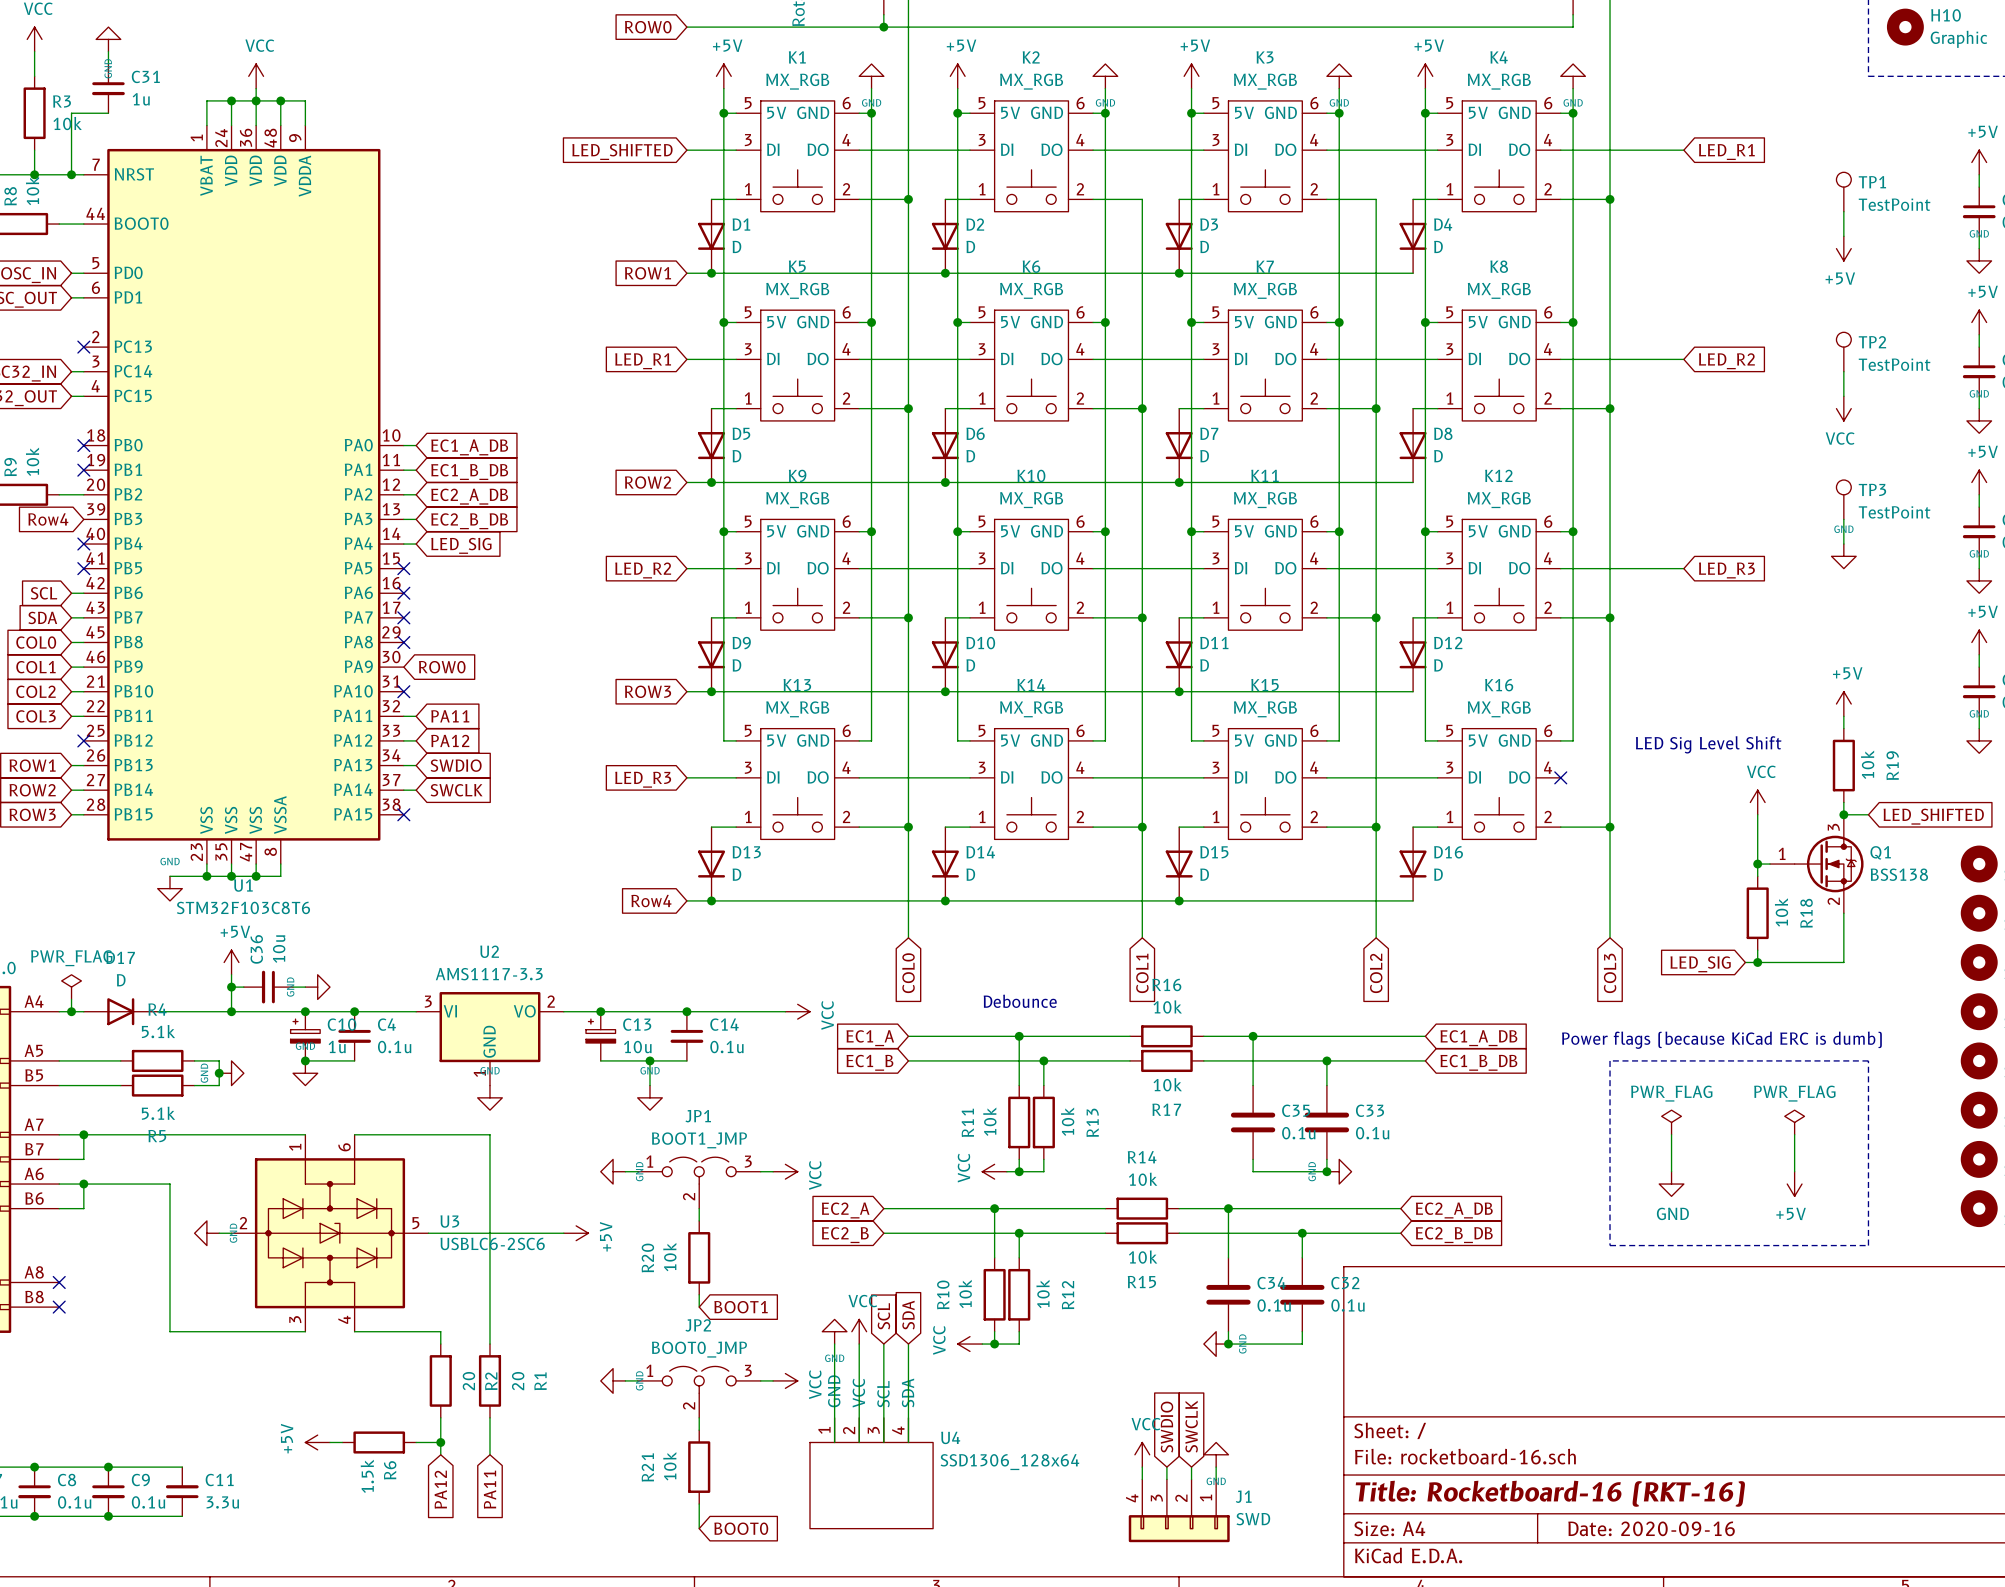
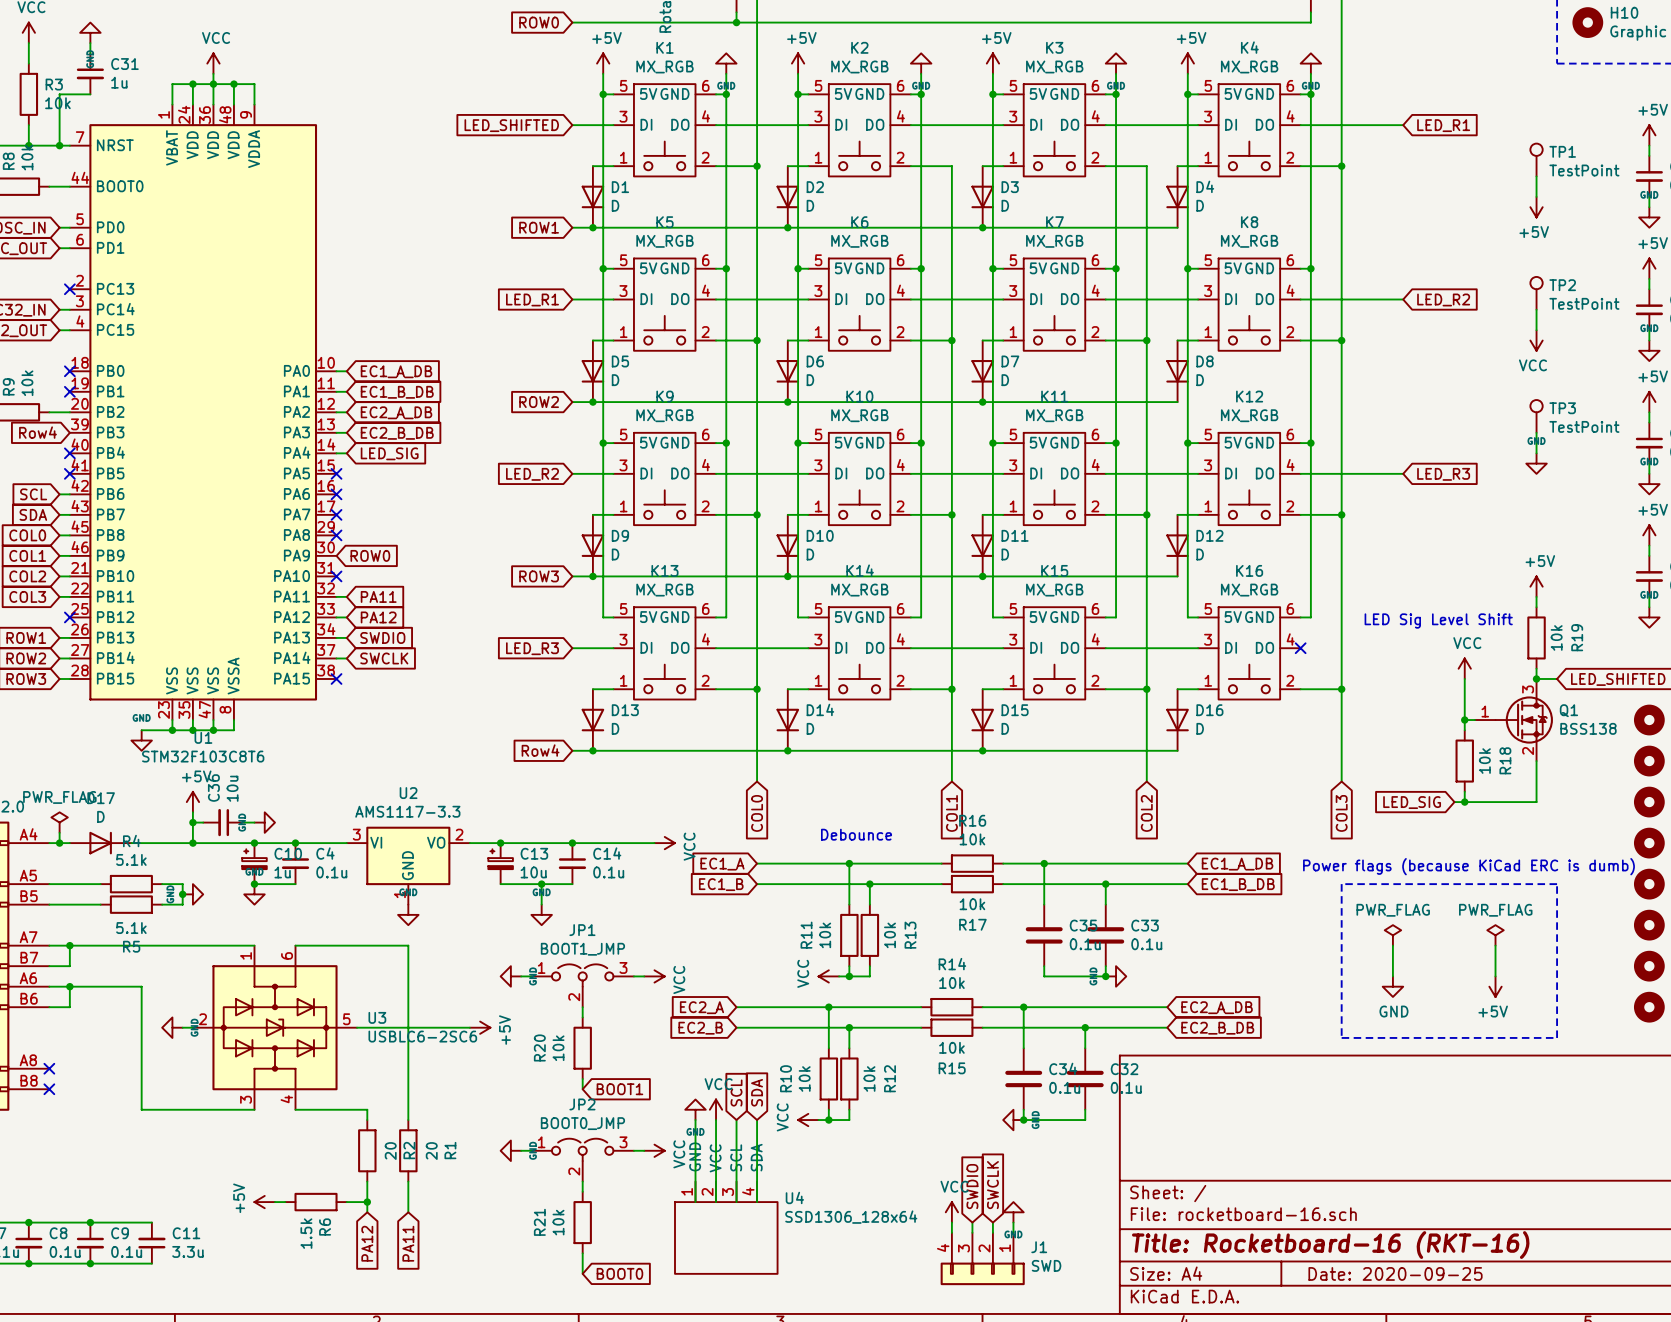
title block: Date: 2020-09-16 (1651, 1528) -> Date: 2020-09-25 (1395, 1273)

